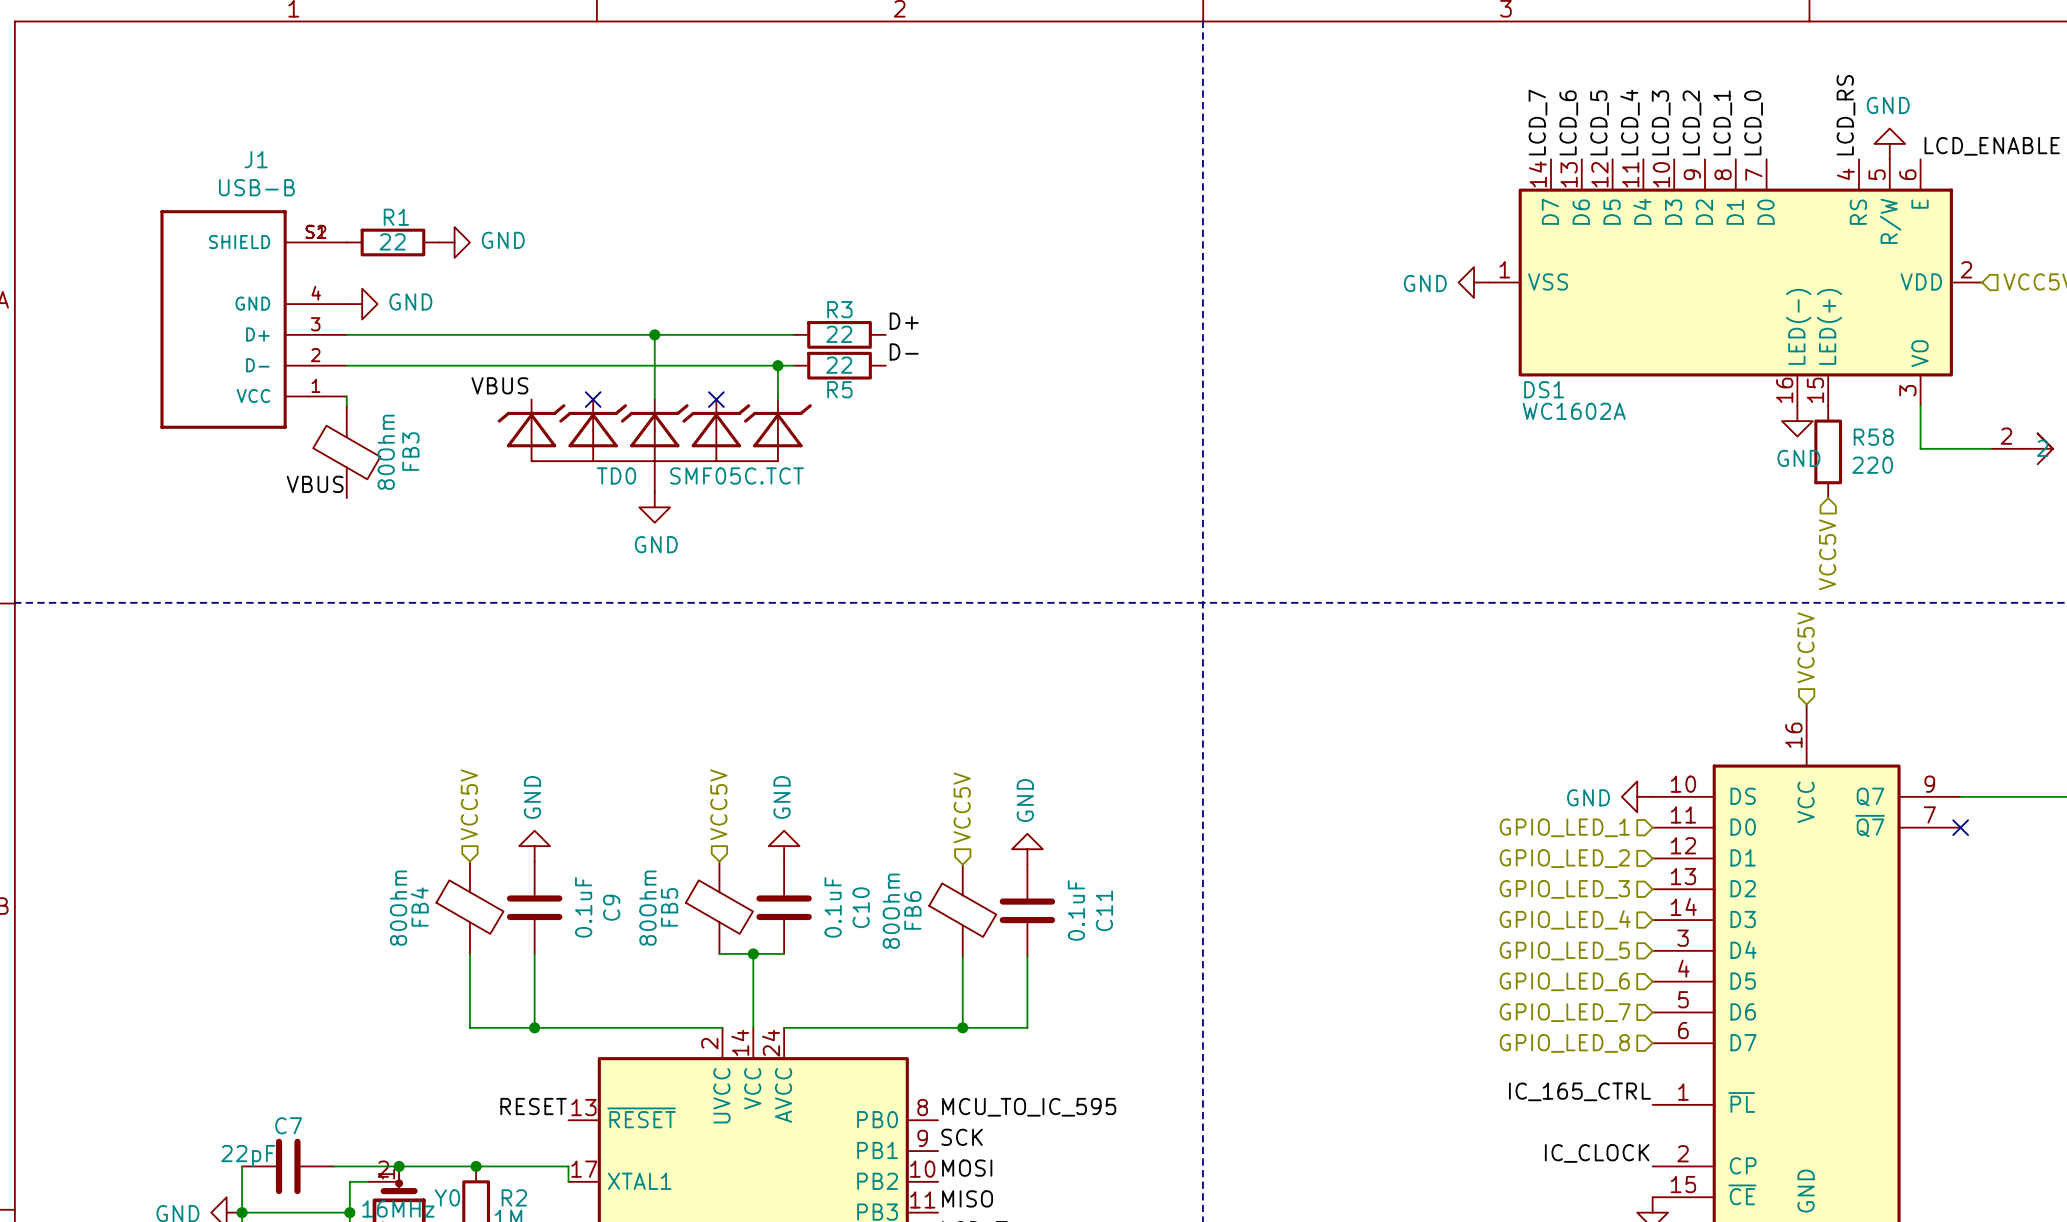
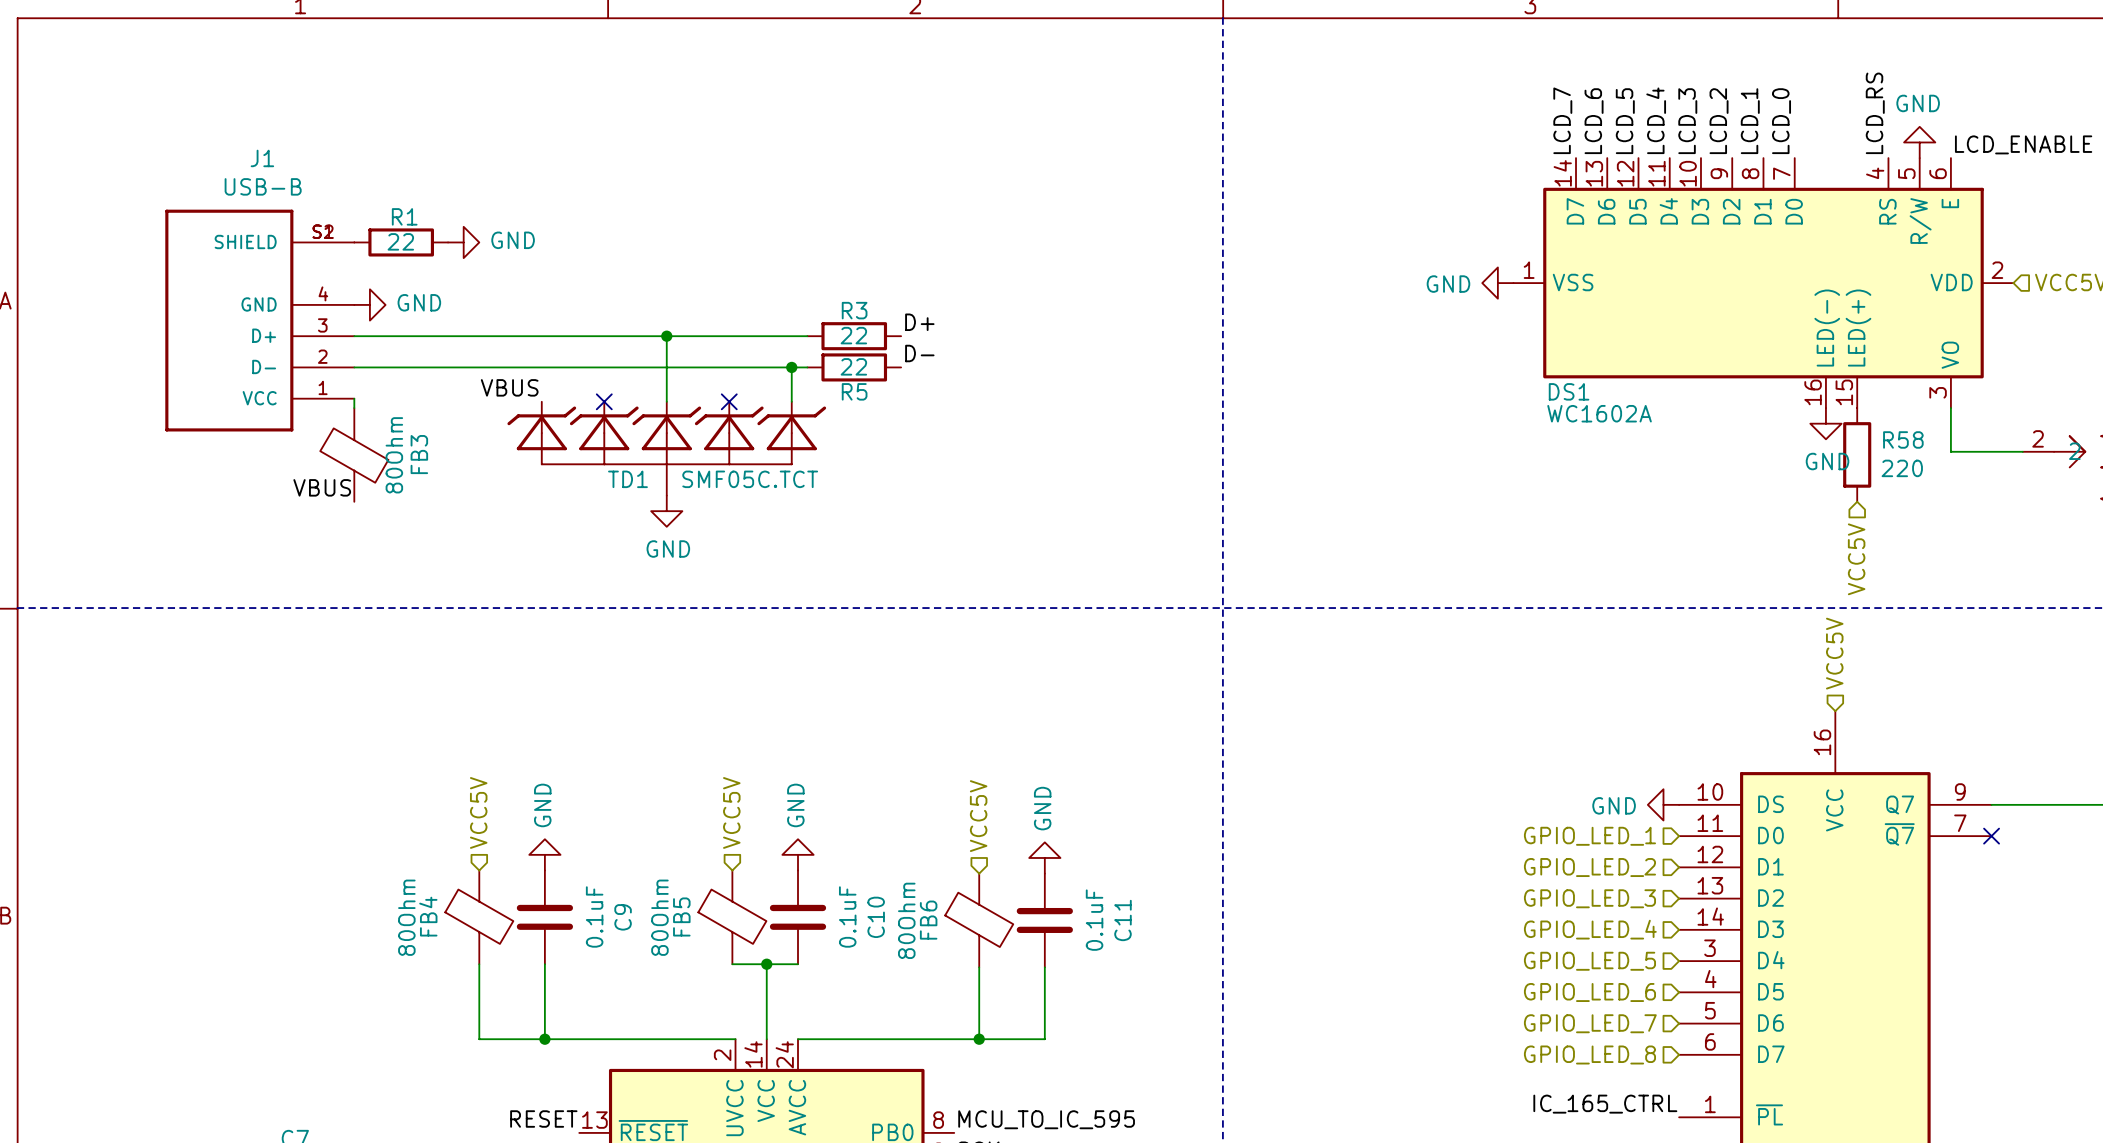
TD0 name: TD0 (616, 475) -> TD1 (627, 479)

